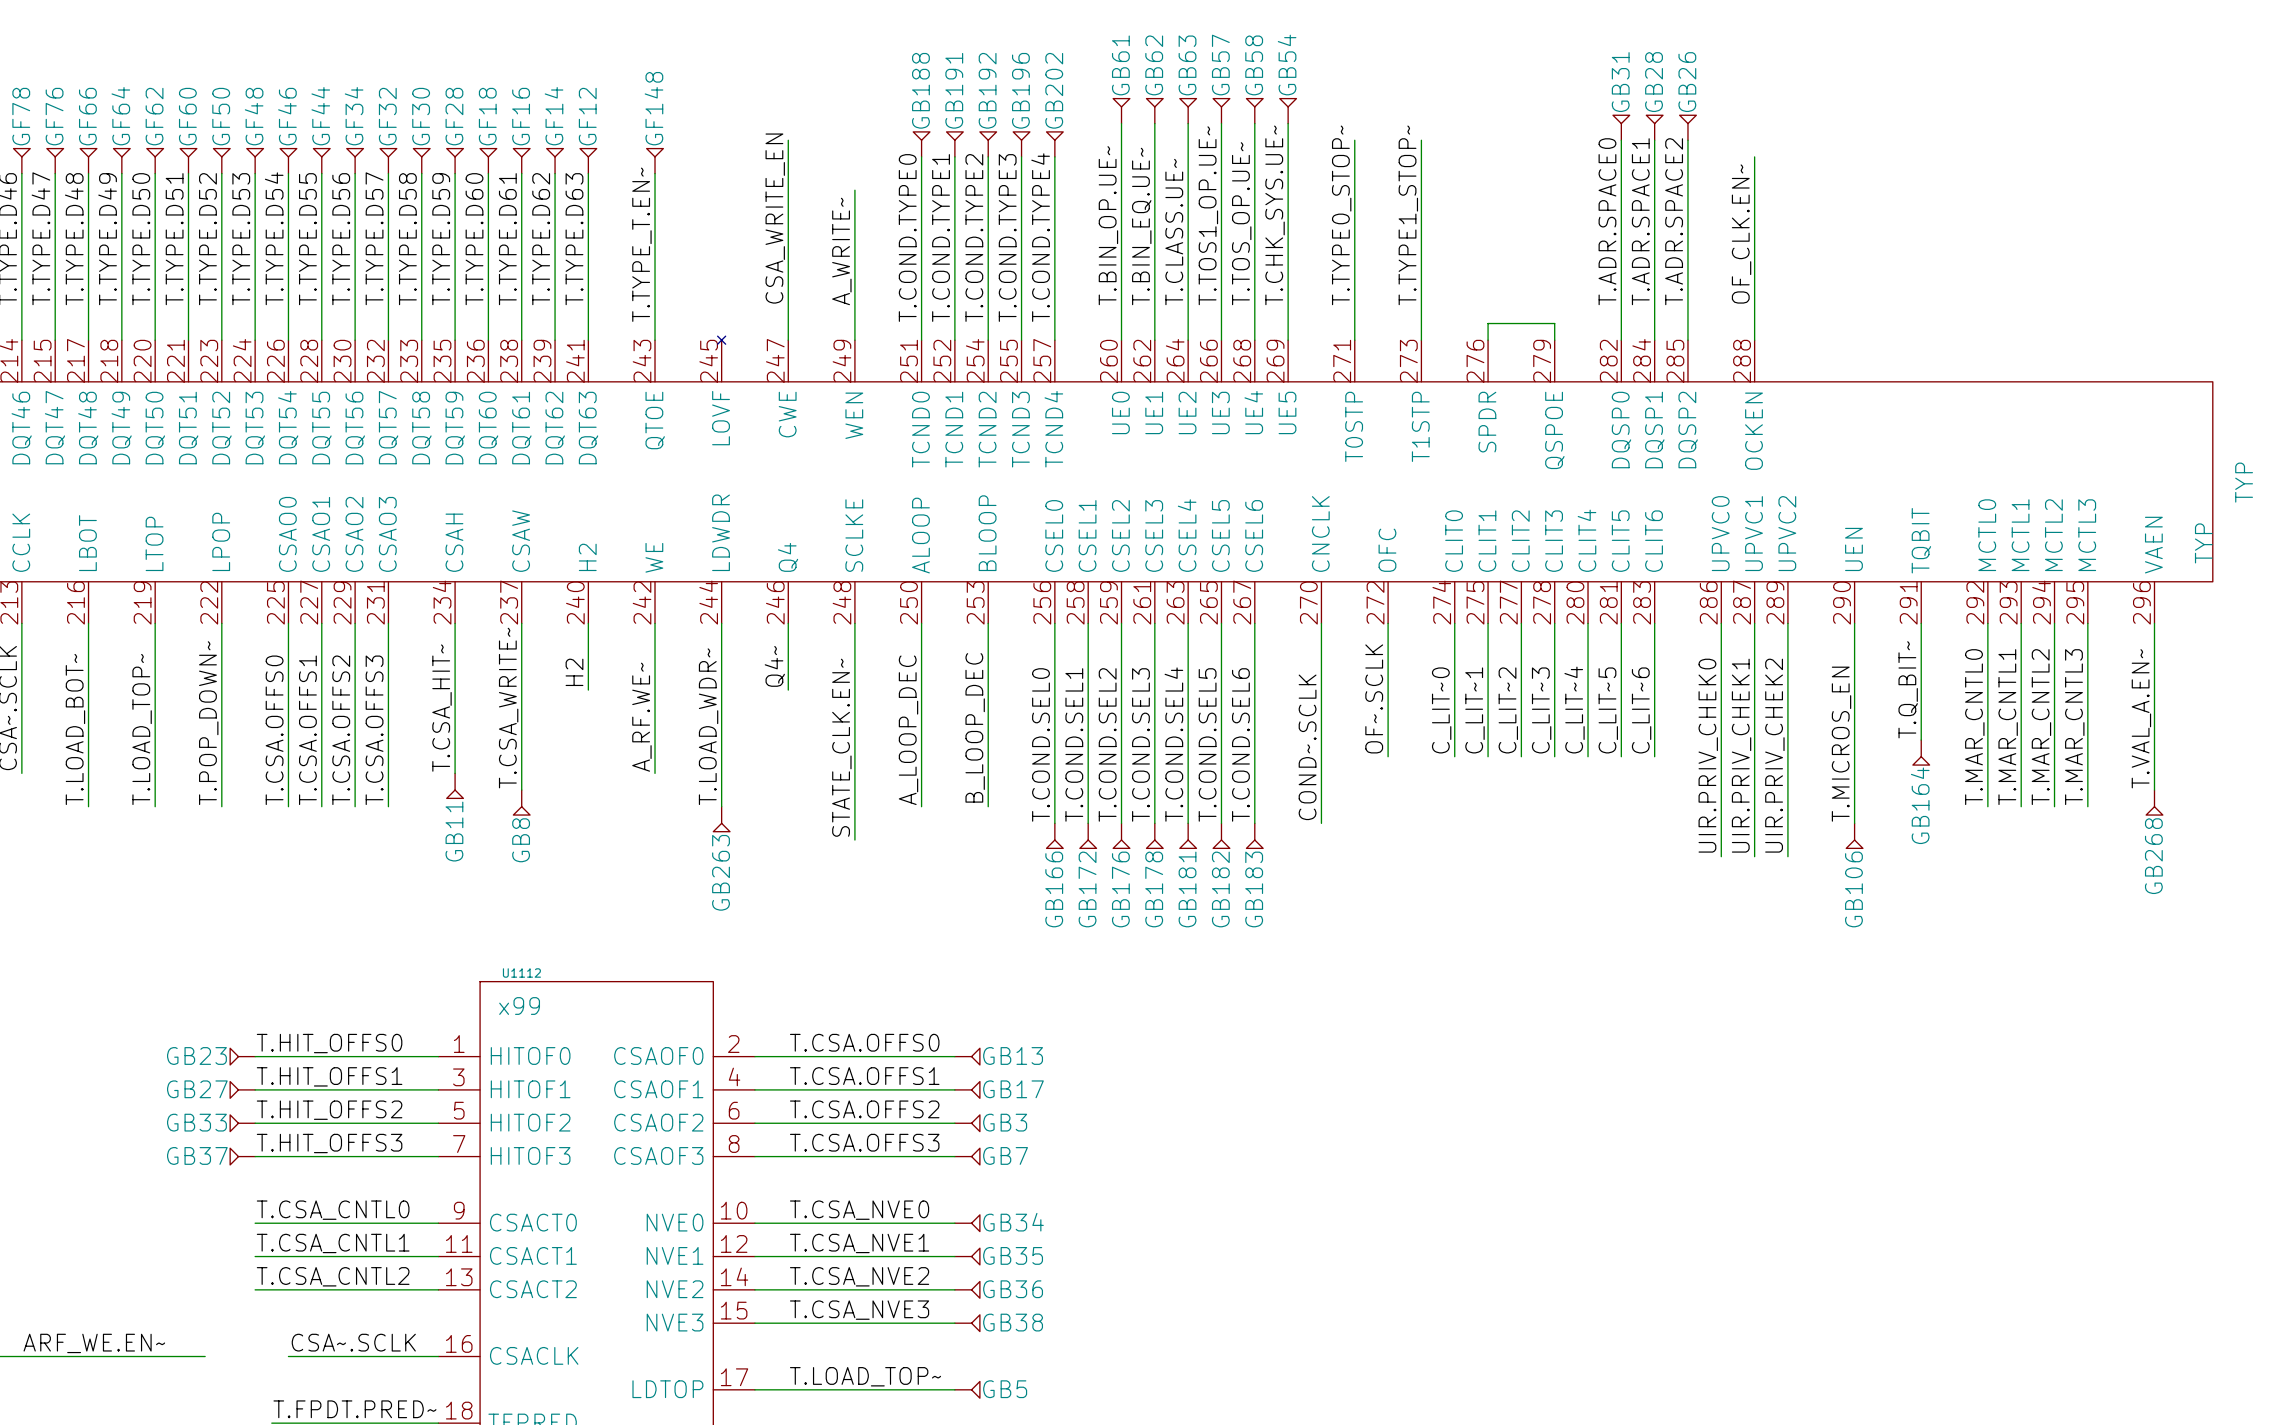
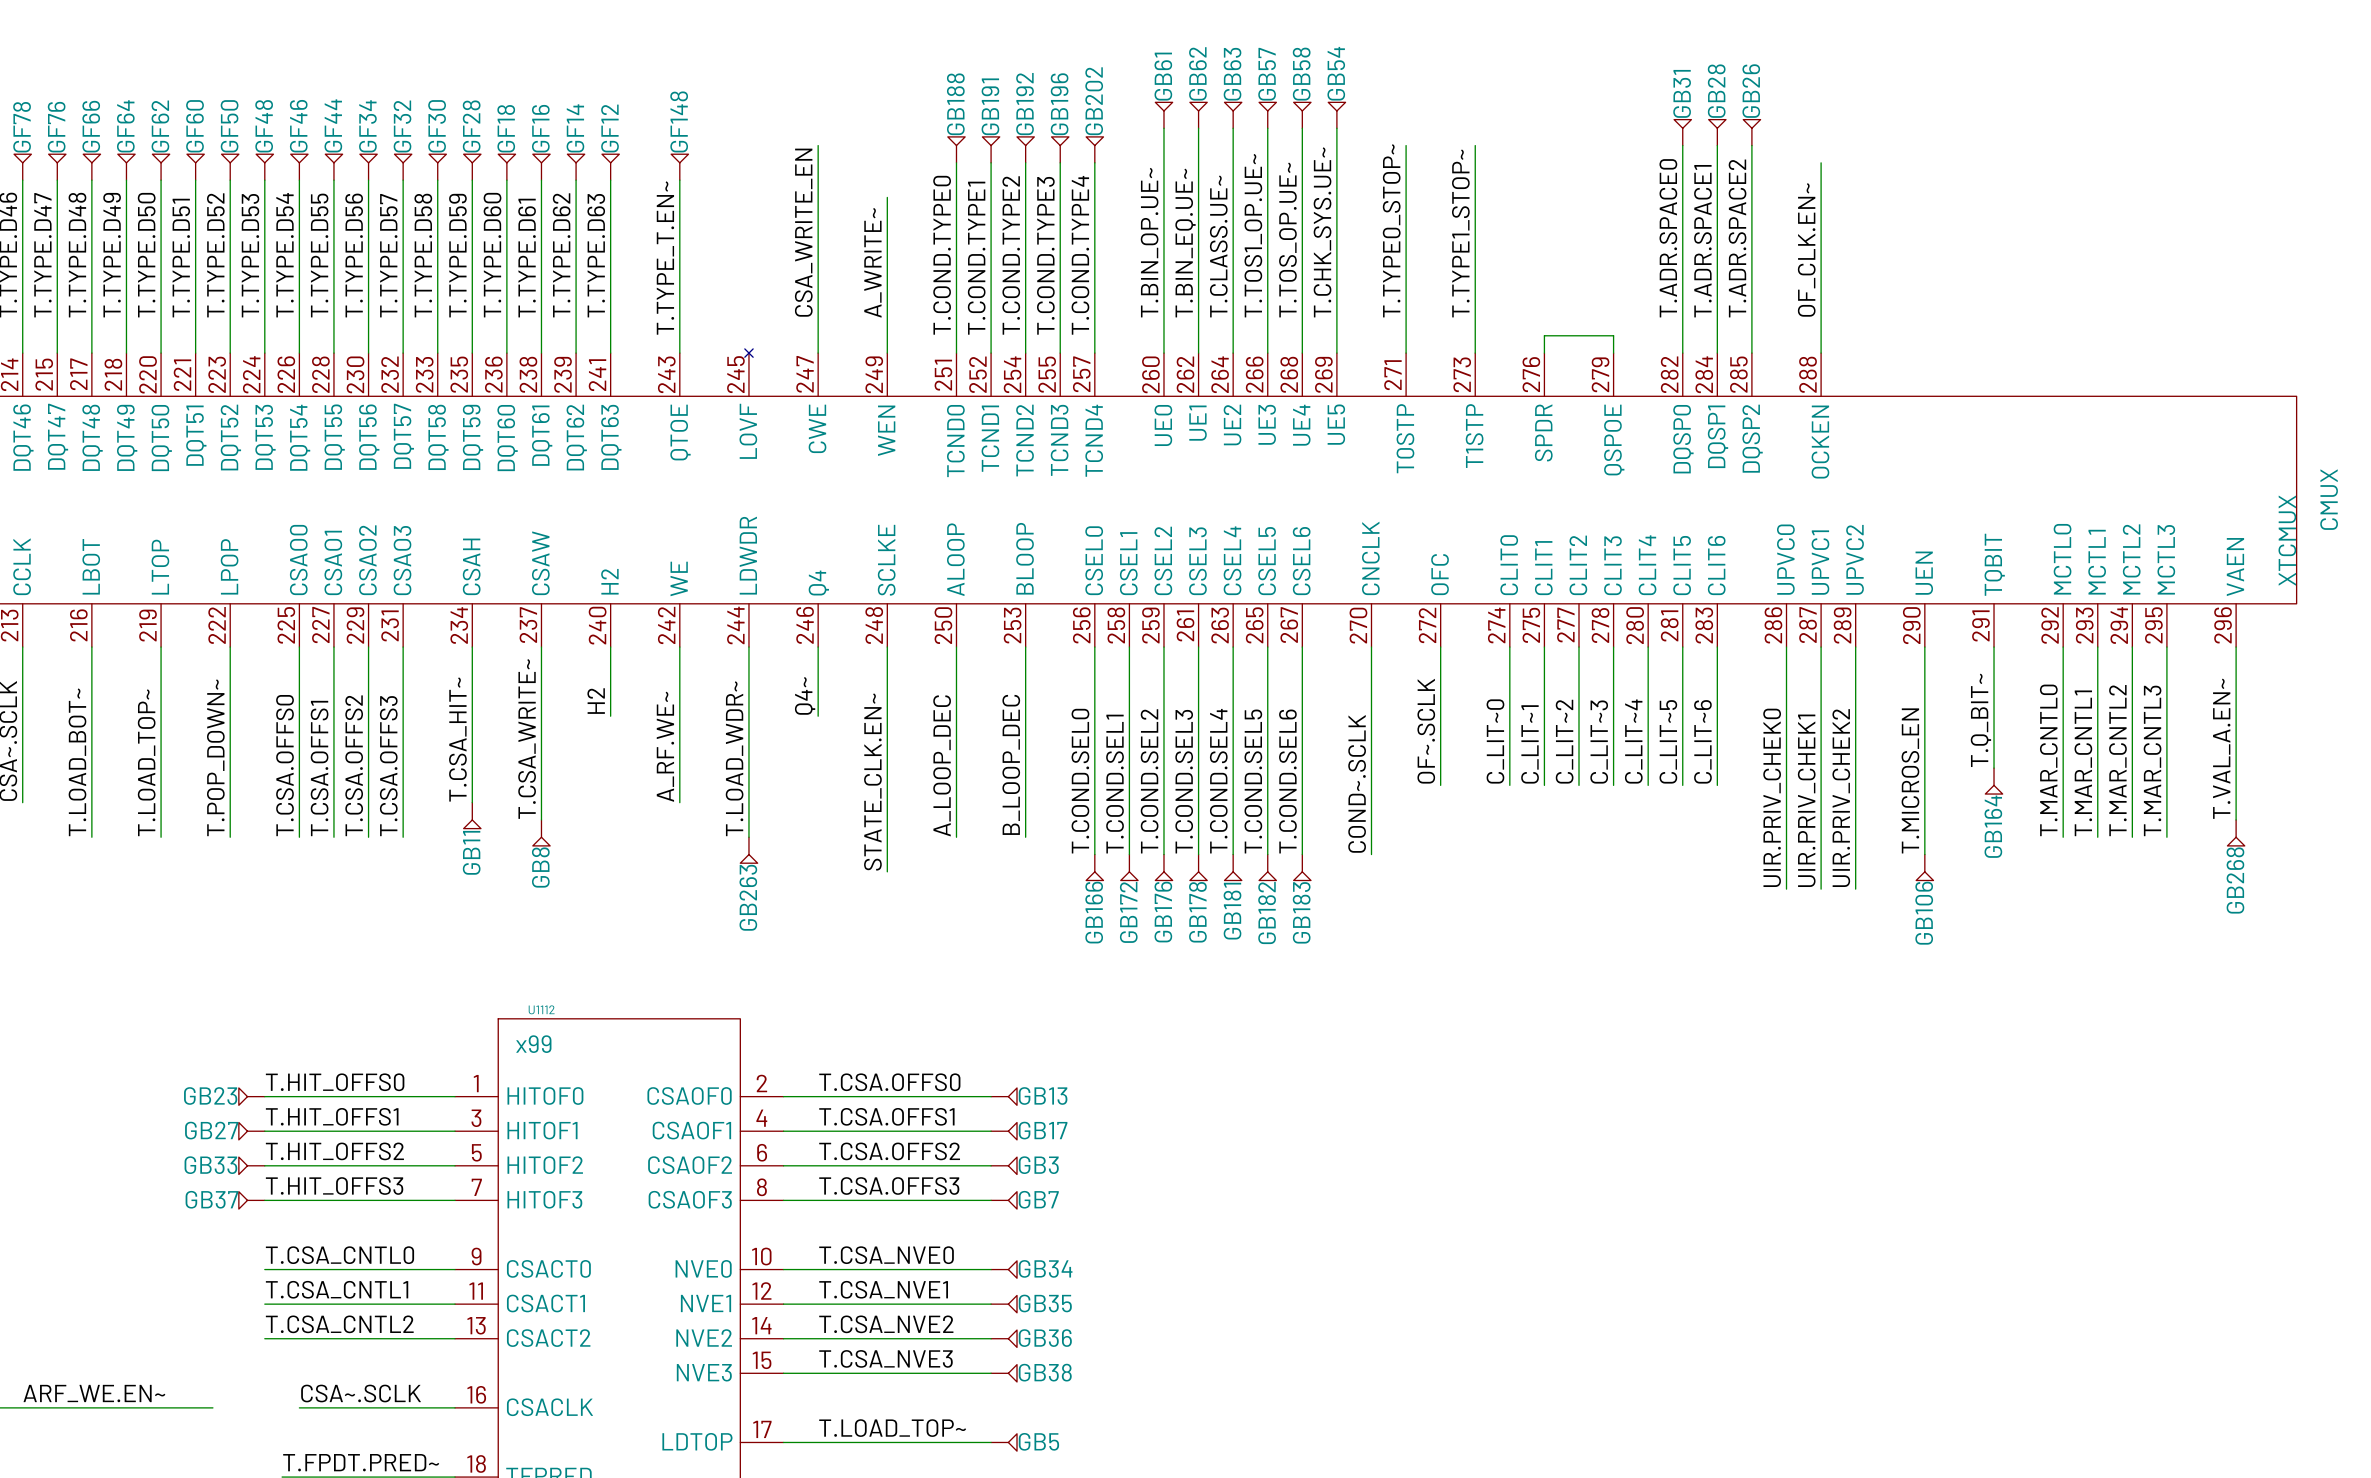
part text: TYP (2244, 482) -> CMUX (2329, 499)
part value: TYP (2203, 543) -> XTCMUX (2287, 540)

